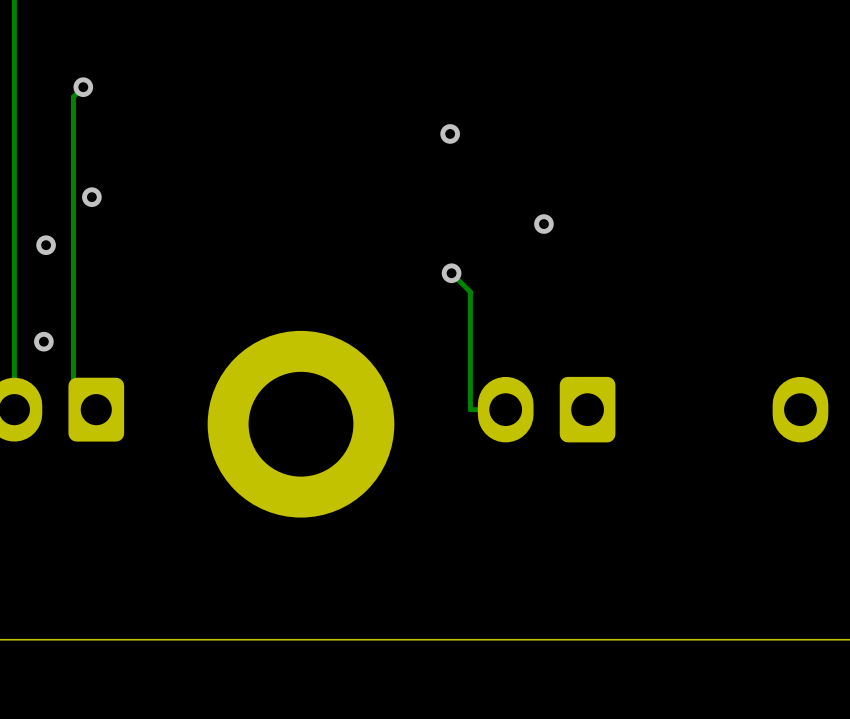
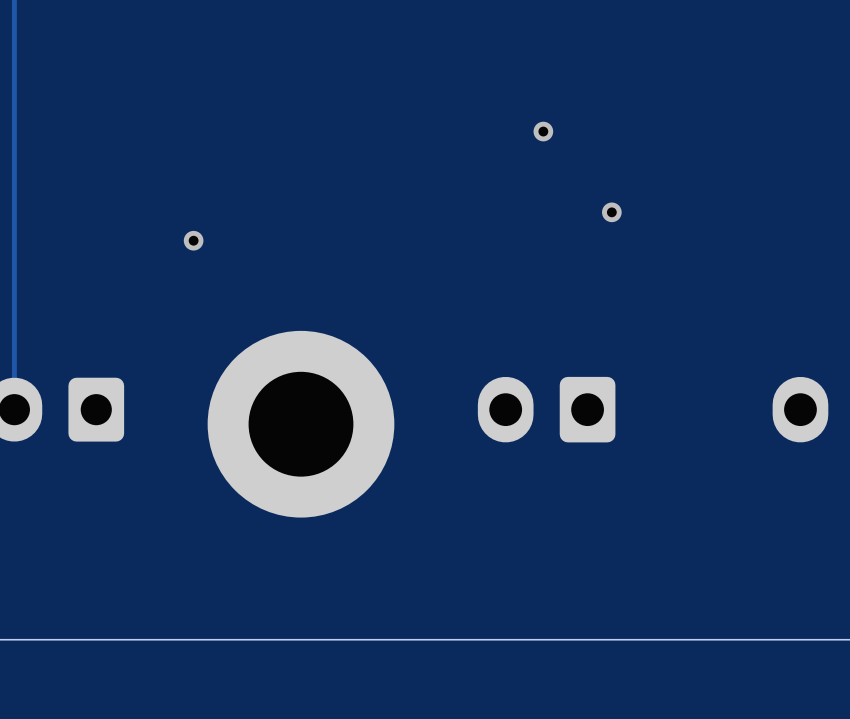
track: (83, 87) (73, 97) (73, 386) (96, 409) -> none
via: (83, 87) -> none
via: none -> (543, 131)
via: (450, 133) -> none
via: (91, 197) -> none
via: none -> (611, 212)
via: (543, 224) -> none
via: none -> (193, 240)
via: (46, 245) -> none
track: (451, 273) (470, 292) (470, 409) (505, 409) -> none
via: (451, 273) -> none
via: (43, 341) -> none

